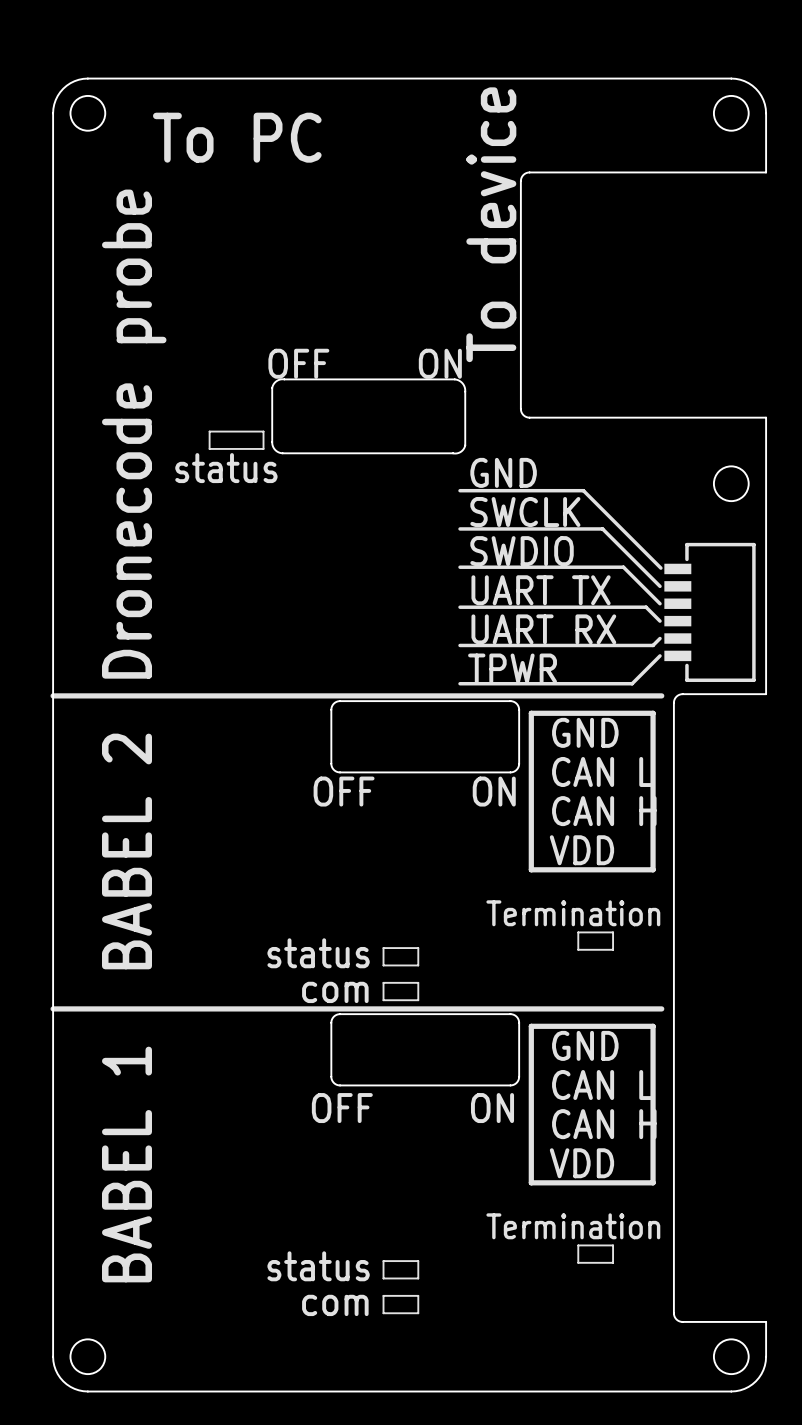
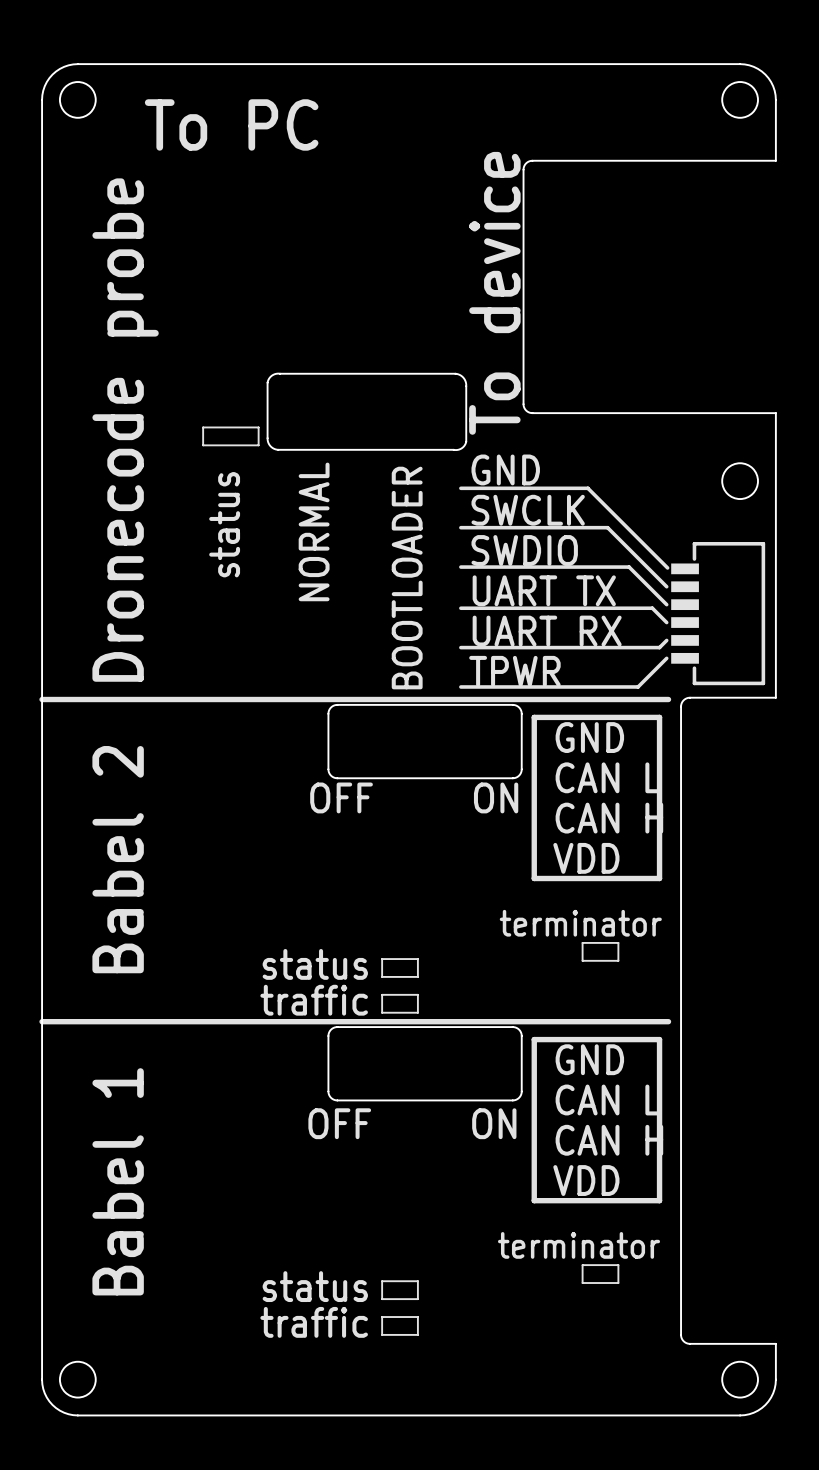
text position: To device (491, 224) -> To device (494, 293)
text: OFF (298, 363) -> none
text: ON (440, 363) -> none
text rotation: 0° (226, 468) -> 90° counterclockwise (224, 524)
text: none -> NORMAL (314, 531)
text: none -> BOOTLOADER (407, 578)
text: BABEL 2 (127, 851) -> Babel 2 (118, 859)
text: Termination (573, 913) -> terminator (580, 923)
text: com (335, 992) -> traffic (314, 1000)
text: BABEL 1 (127, 1164) -> Babel 1 (118, 1181)
text: Termination (573, 1226) -> terminator (579, 1245)
text: com (335, 1305) -> traffic (314, 1322)

